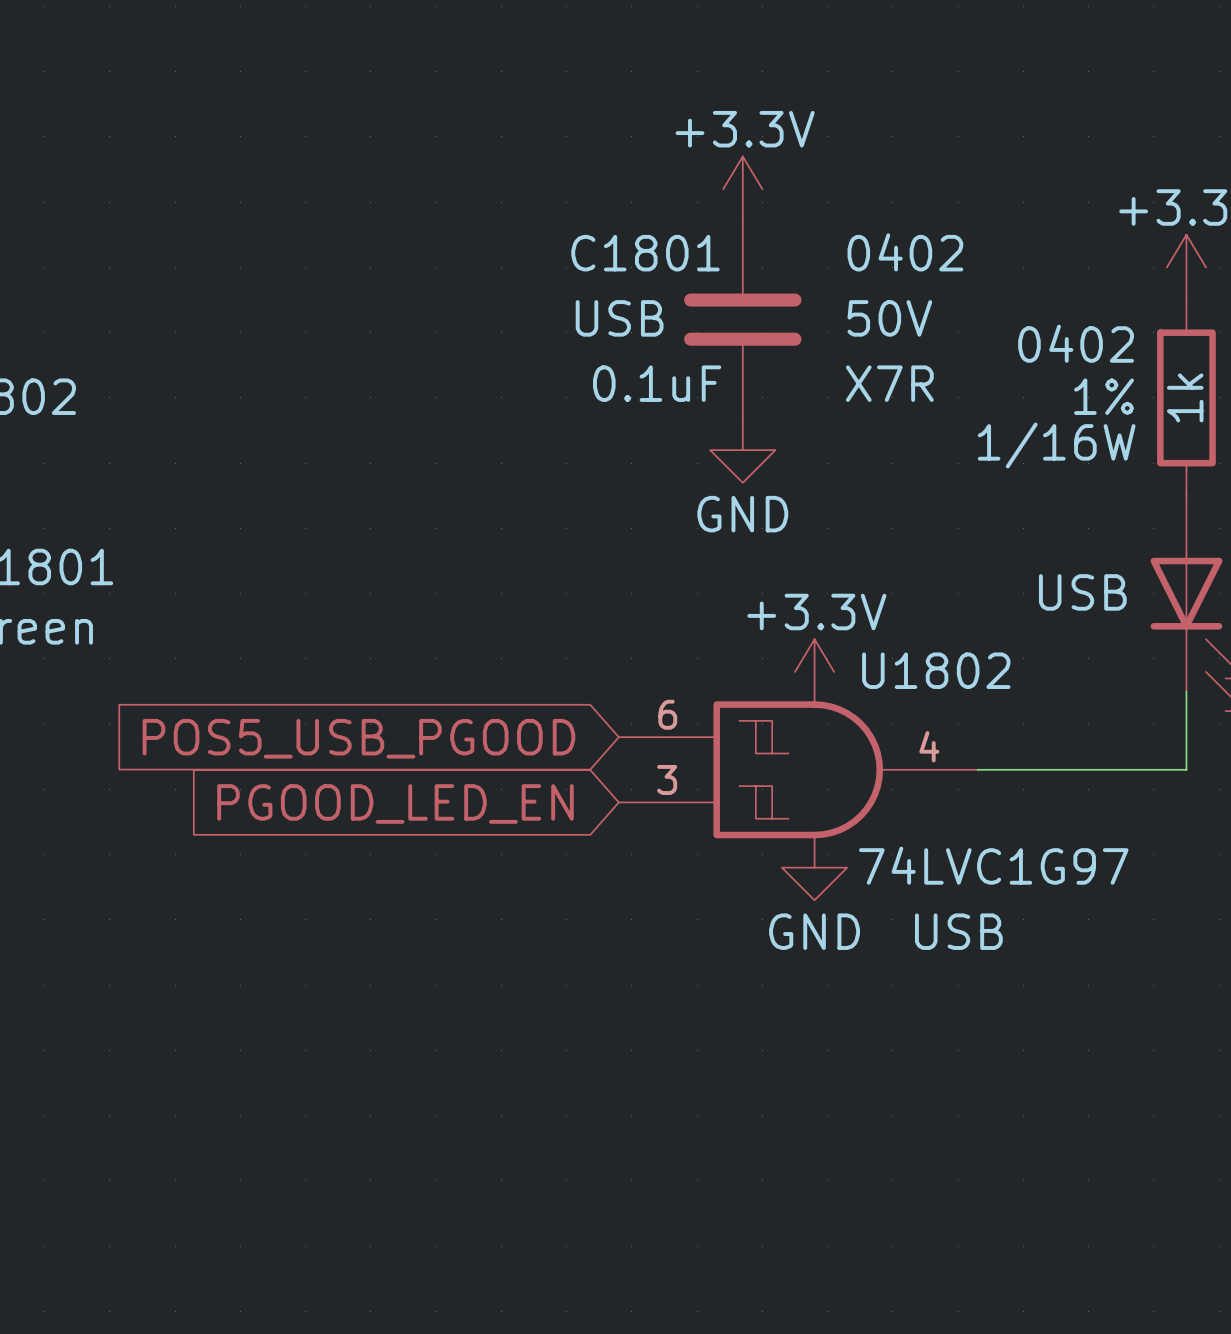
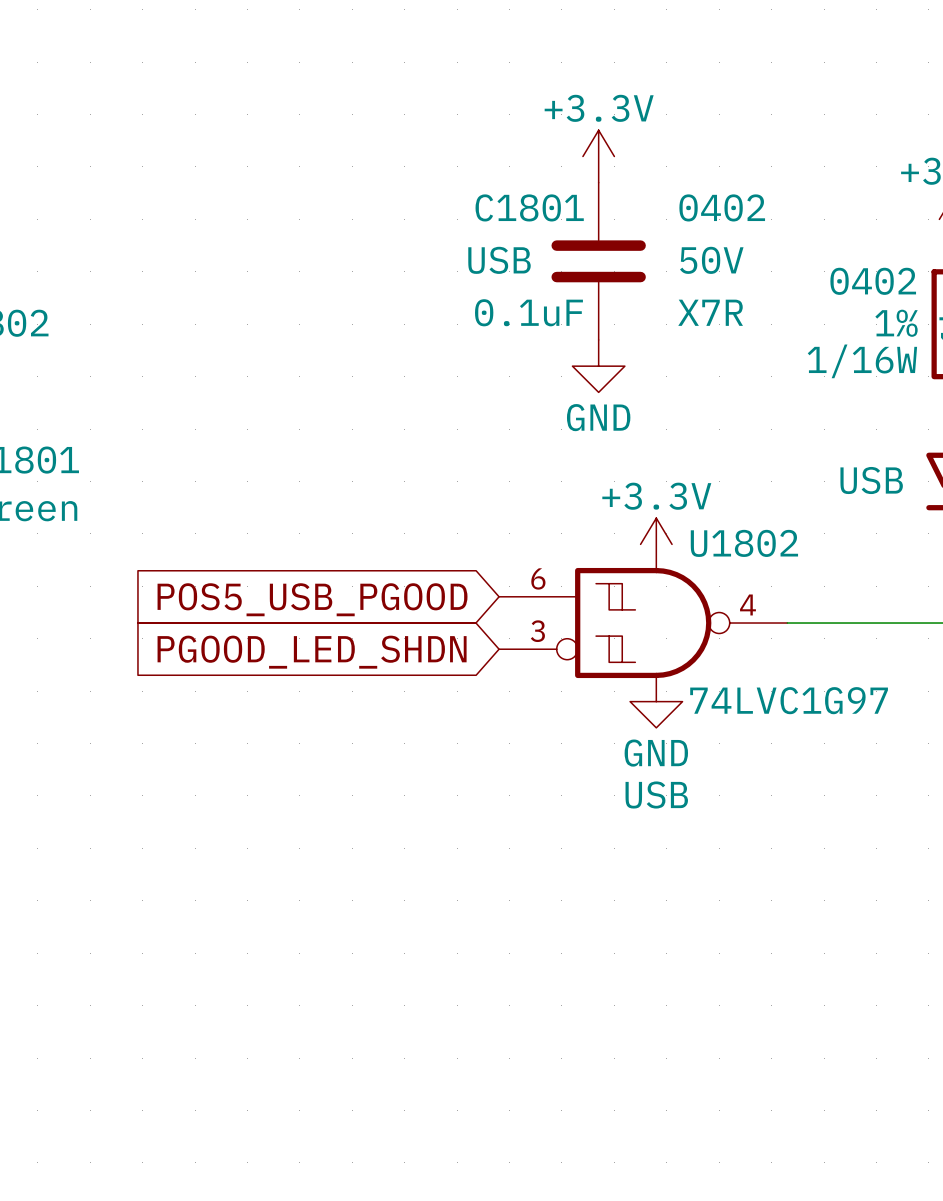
U1802 symbol: [618, 701, 978, 839] -> [499, 567, 788, 679]
global label: PGOOD_LED_EN (395, 803) -> PGOOD_LED_SHDN (312, 652)
U1802 text position: USB (958, 931) -> USB (656, 795)

